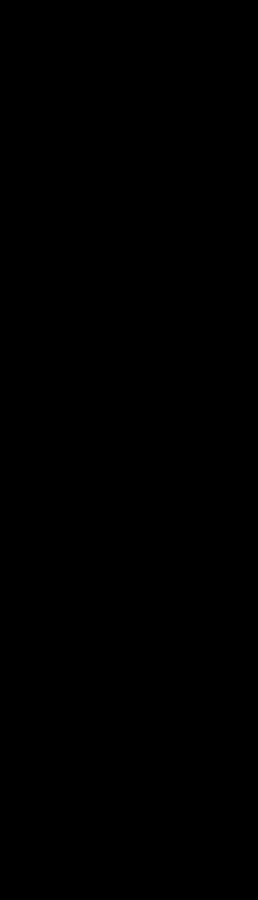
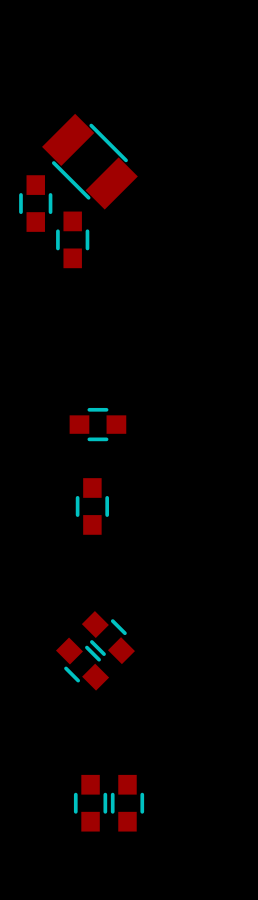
part: none -> (89, 161)
part: none -> (35, 203)
part: none -> (72, 239)
part: none -> (97, 424)
part: none -> (92, 506)
part: none -> (108, 637)
part: none -> (82, 664)
part: none -> (90, 803)
part: none -> (127, 803)

